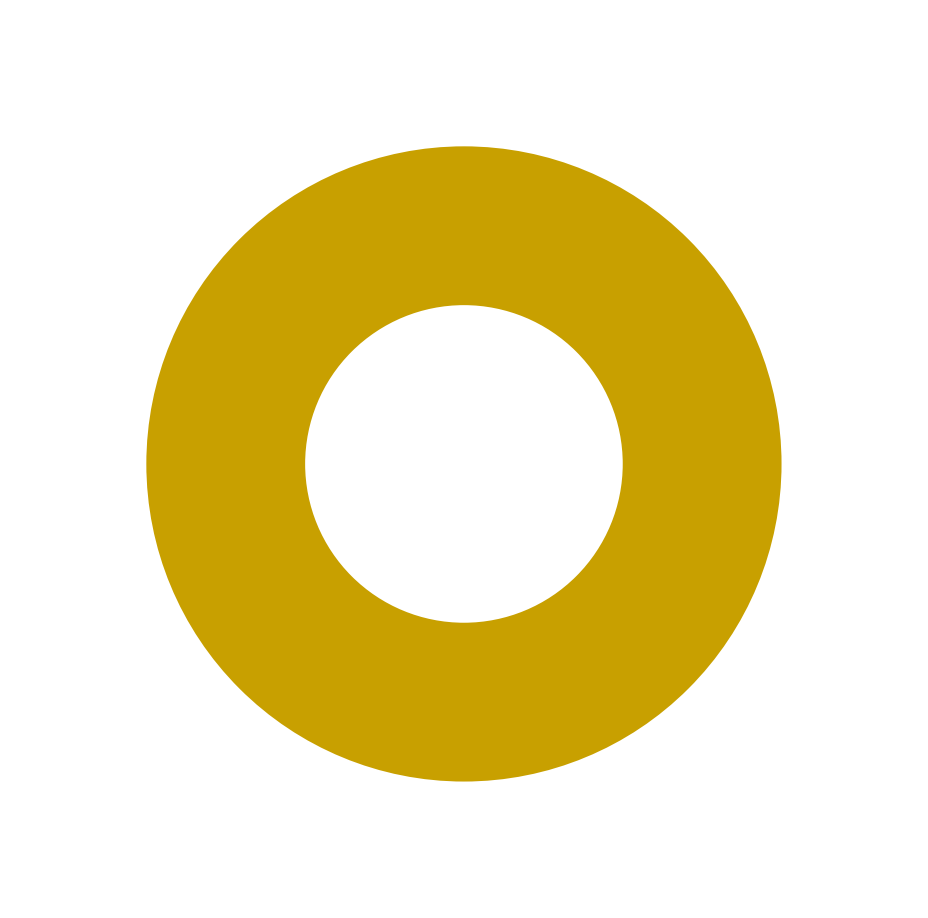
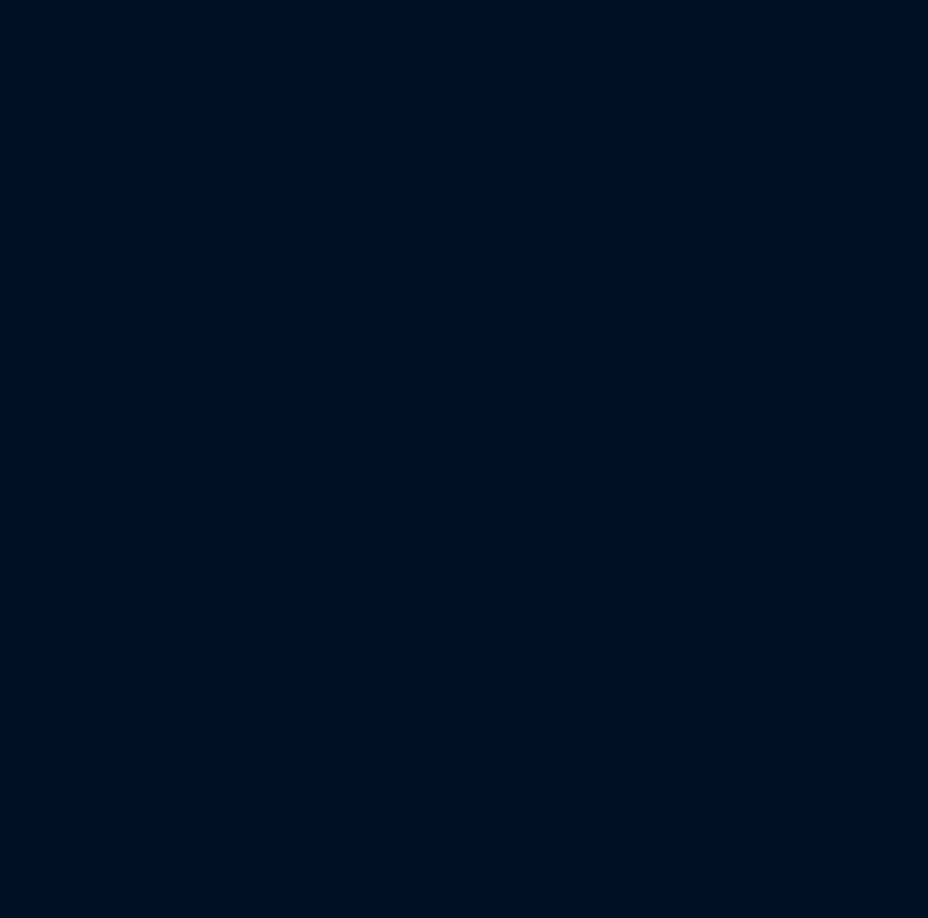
part: (463, 463) -> none

